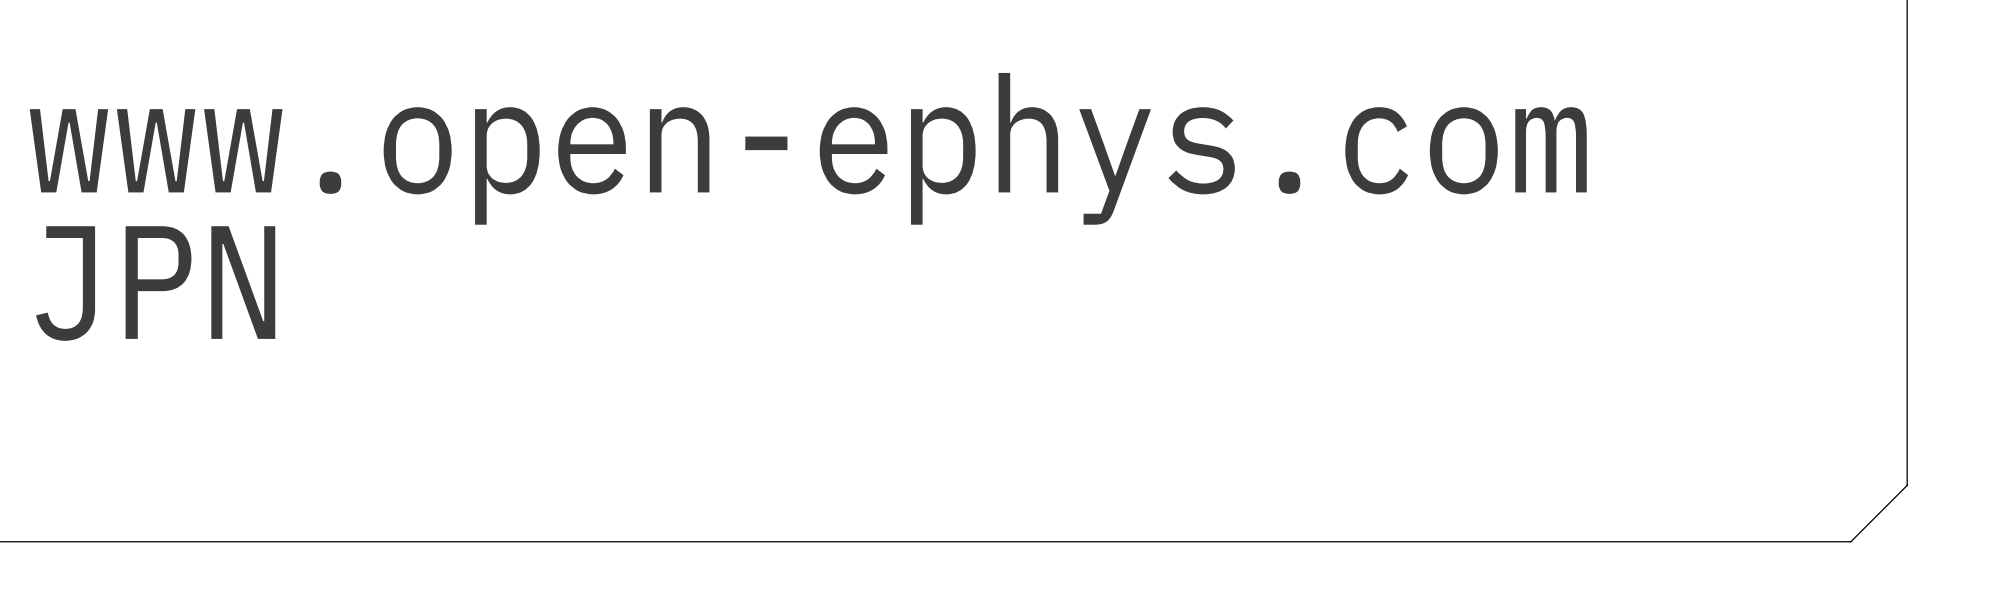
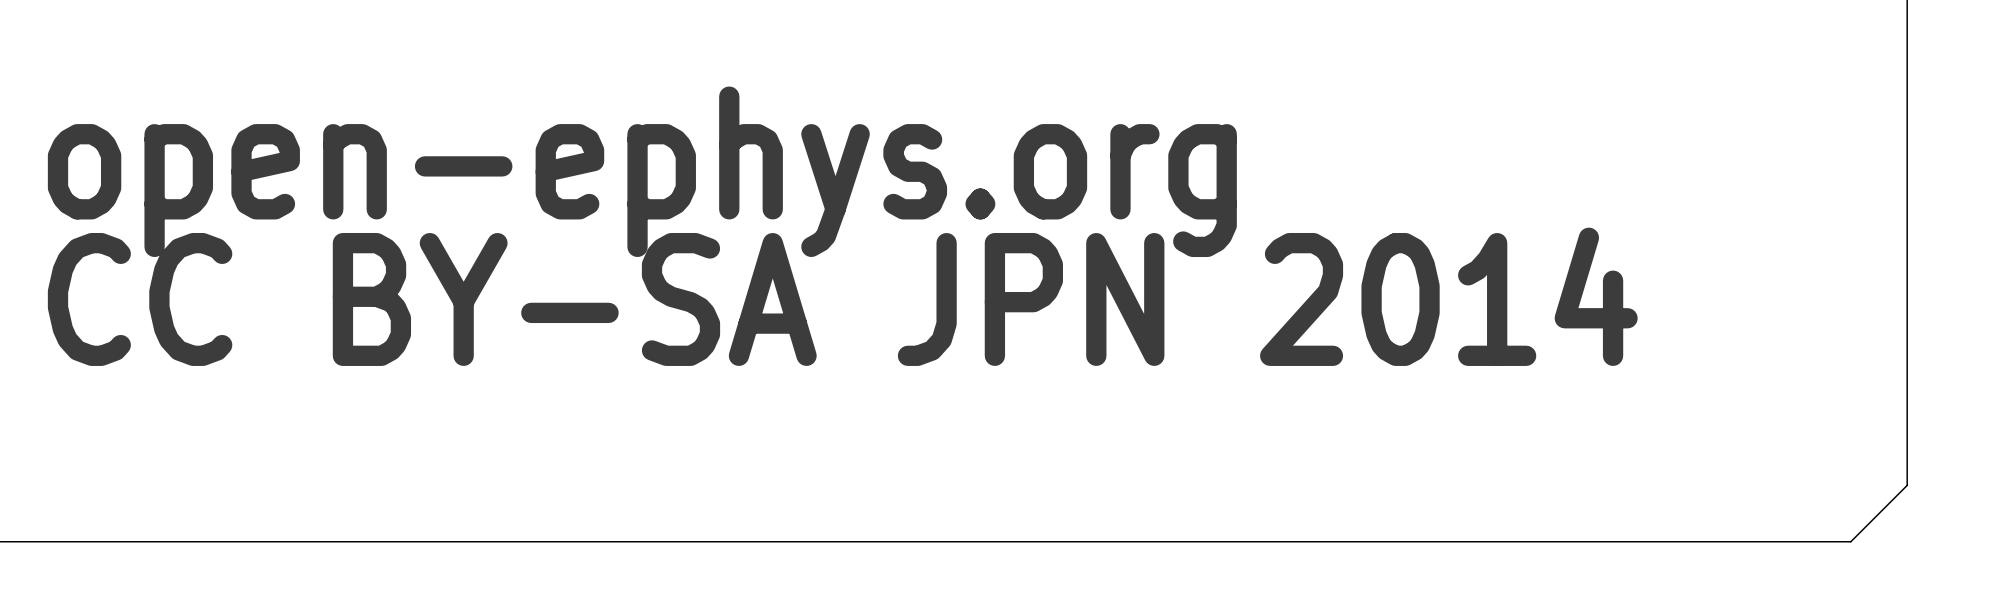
text: www.open-ephys.com (808, 148) -> open-ephys.org (642, 171)
text: JPN (155, 283) -> CC BY-SA JPN 2014 (842, 296)

